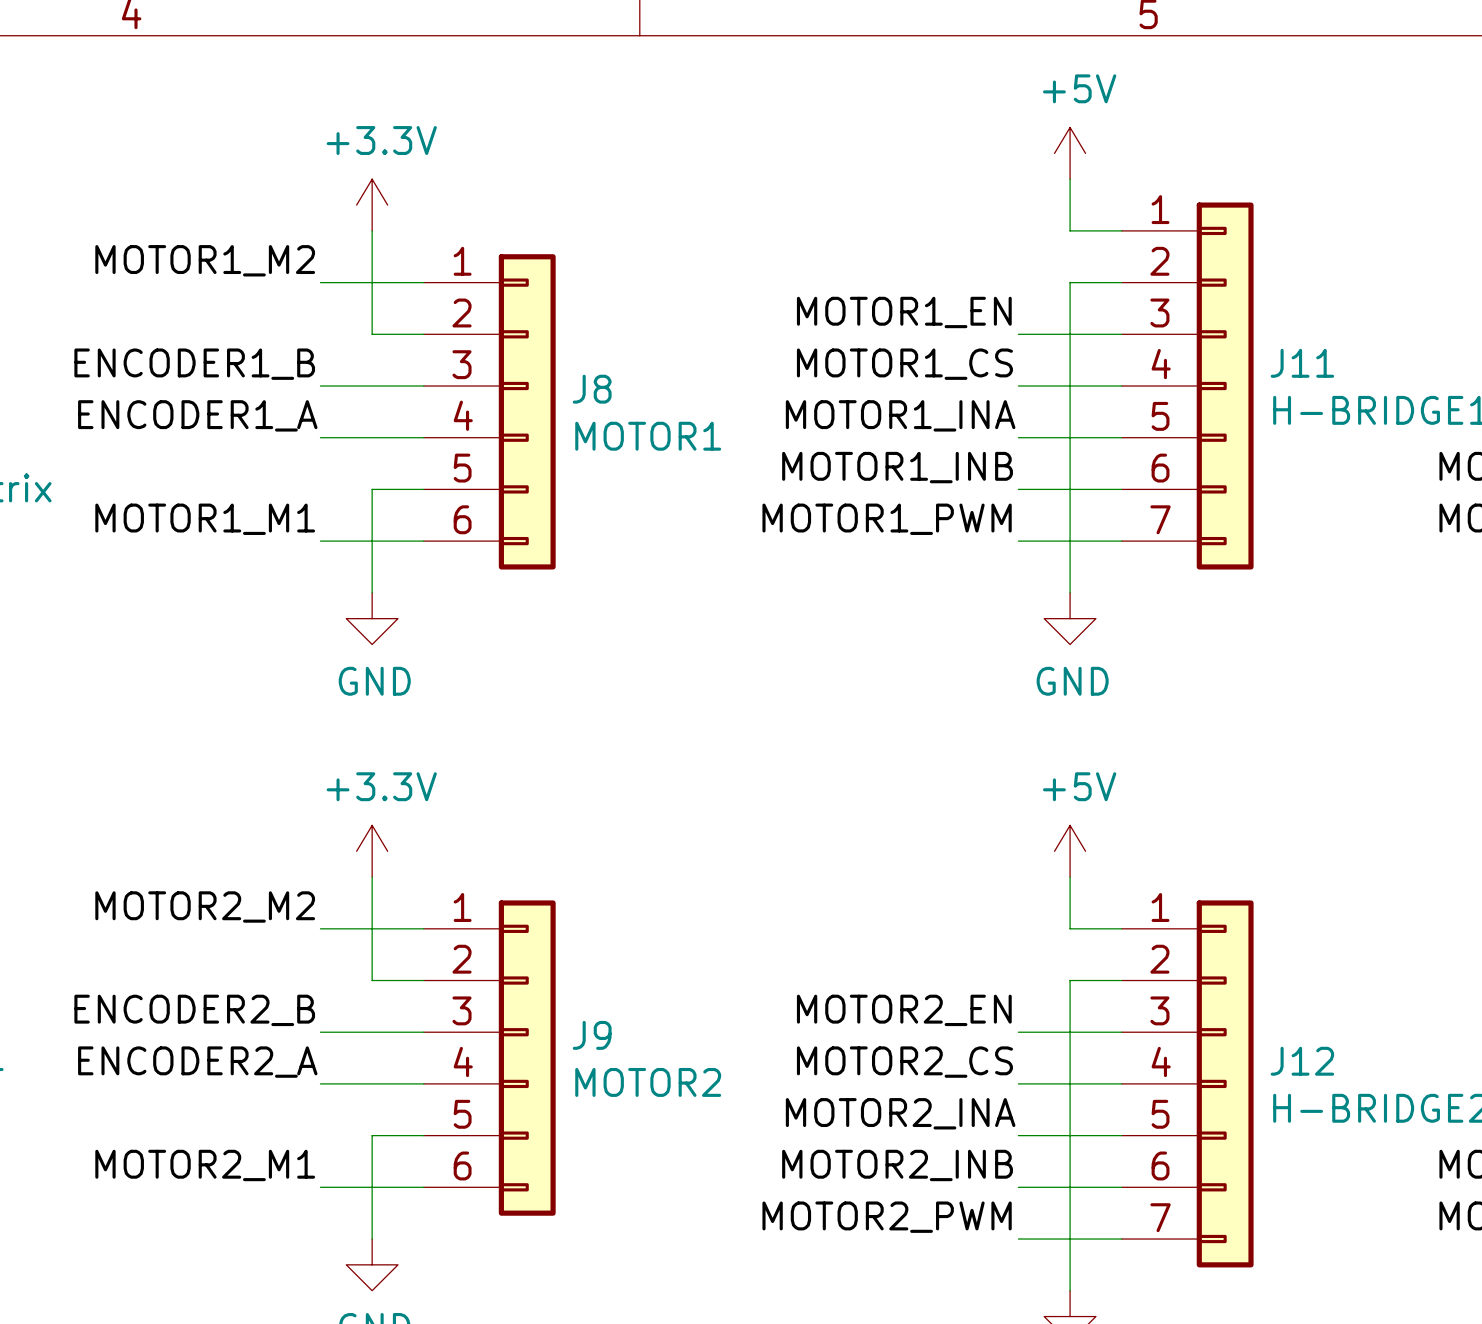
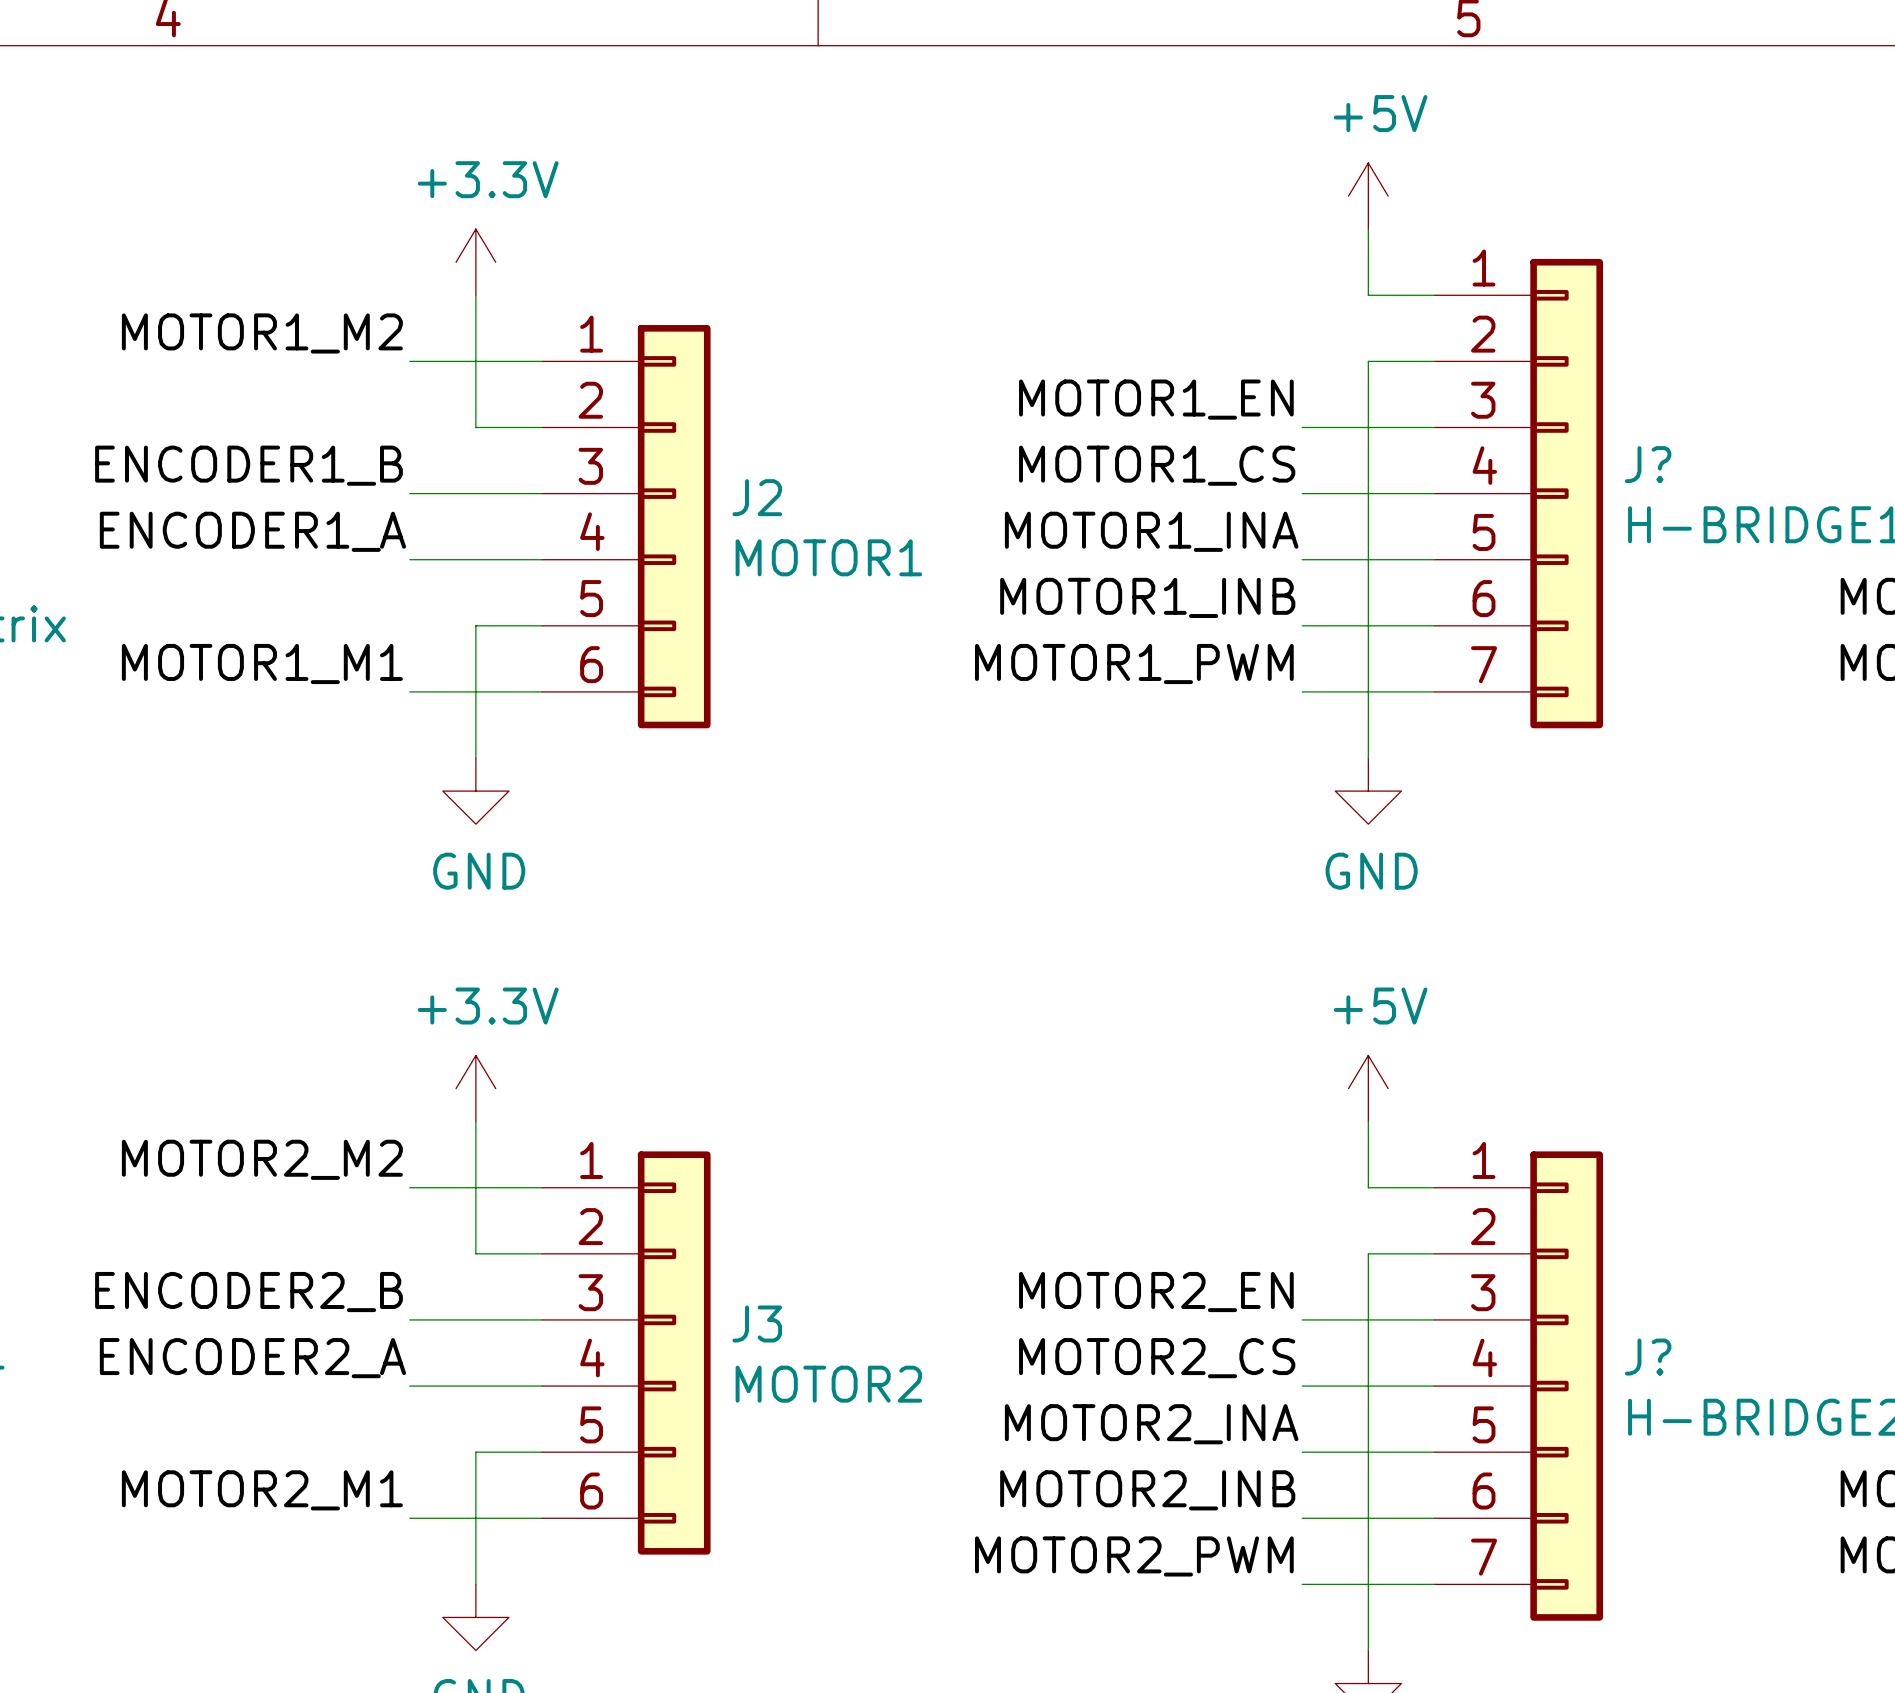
J11 name: J11 (1302, 363) -> J? (1648, 464)
J8 name: J8 (592, 389) -> J2 (757, 497)
J9 name: J9 (592, 1035) -> J3 (757, 1324)
J12 name: J12 (1302, 1061) -> J? (1648, 1357)

